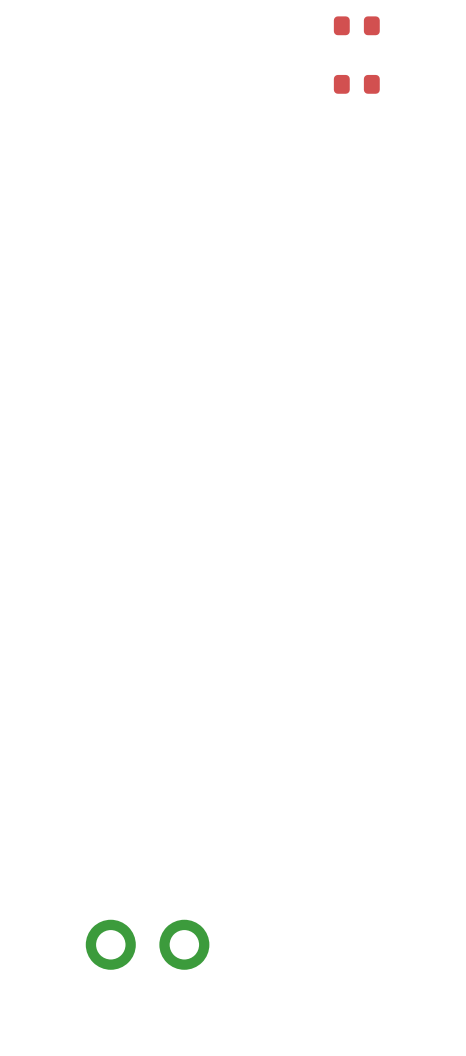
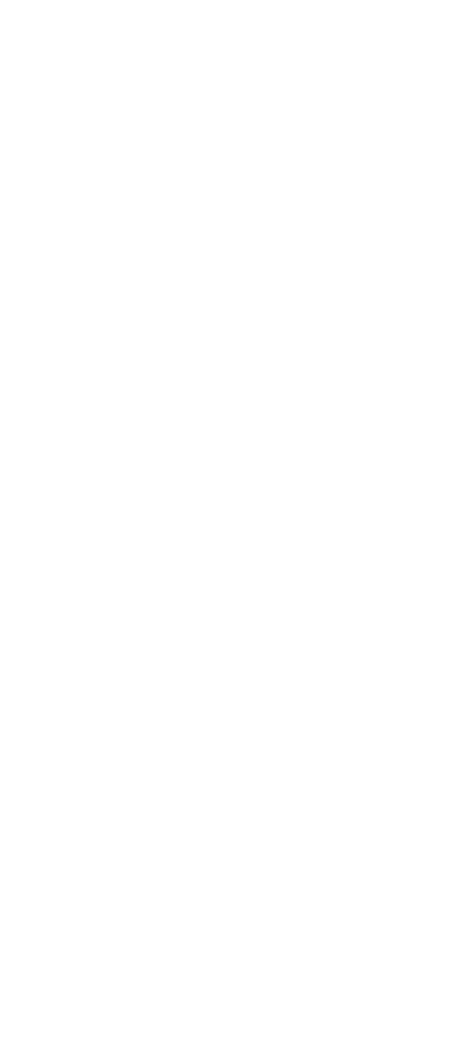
part: (356, 25) -> none
part: (356, 84) -> none
part: (147, 944) -> none

